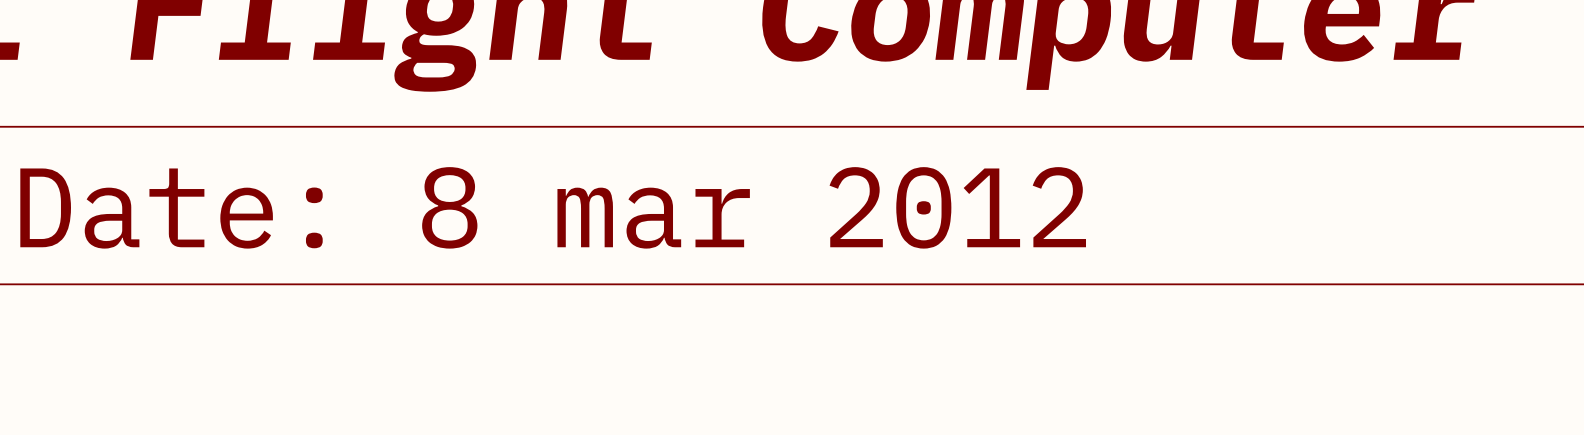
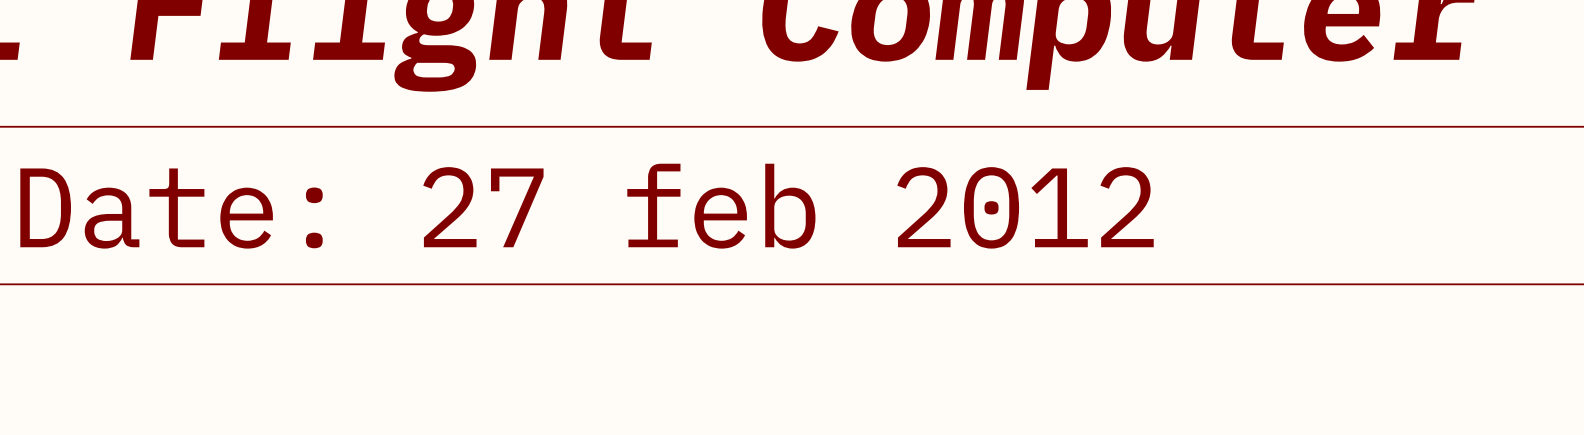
title block: Date: 8 mar 2012 (553, 207) -> Date: 27 feb 2012 (587, 206)

